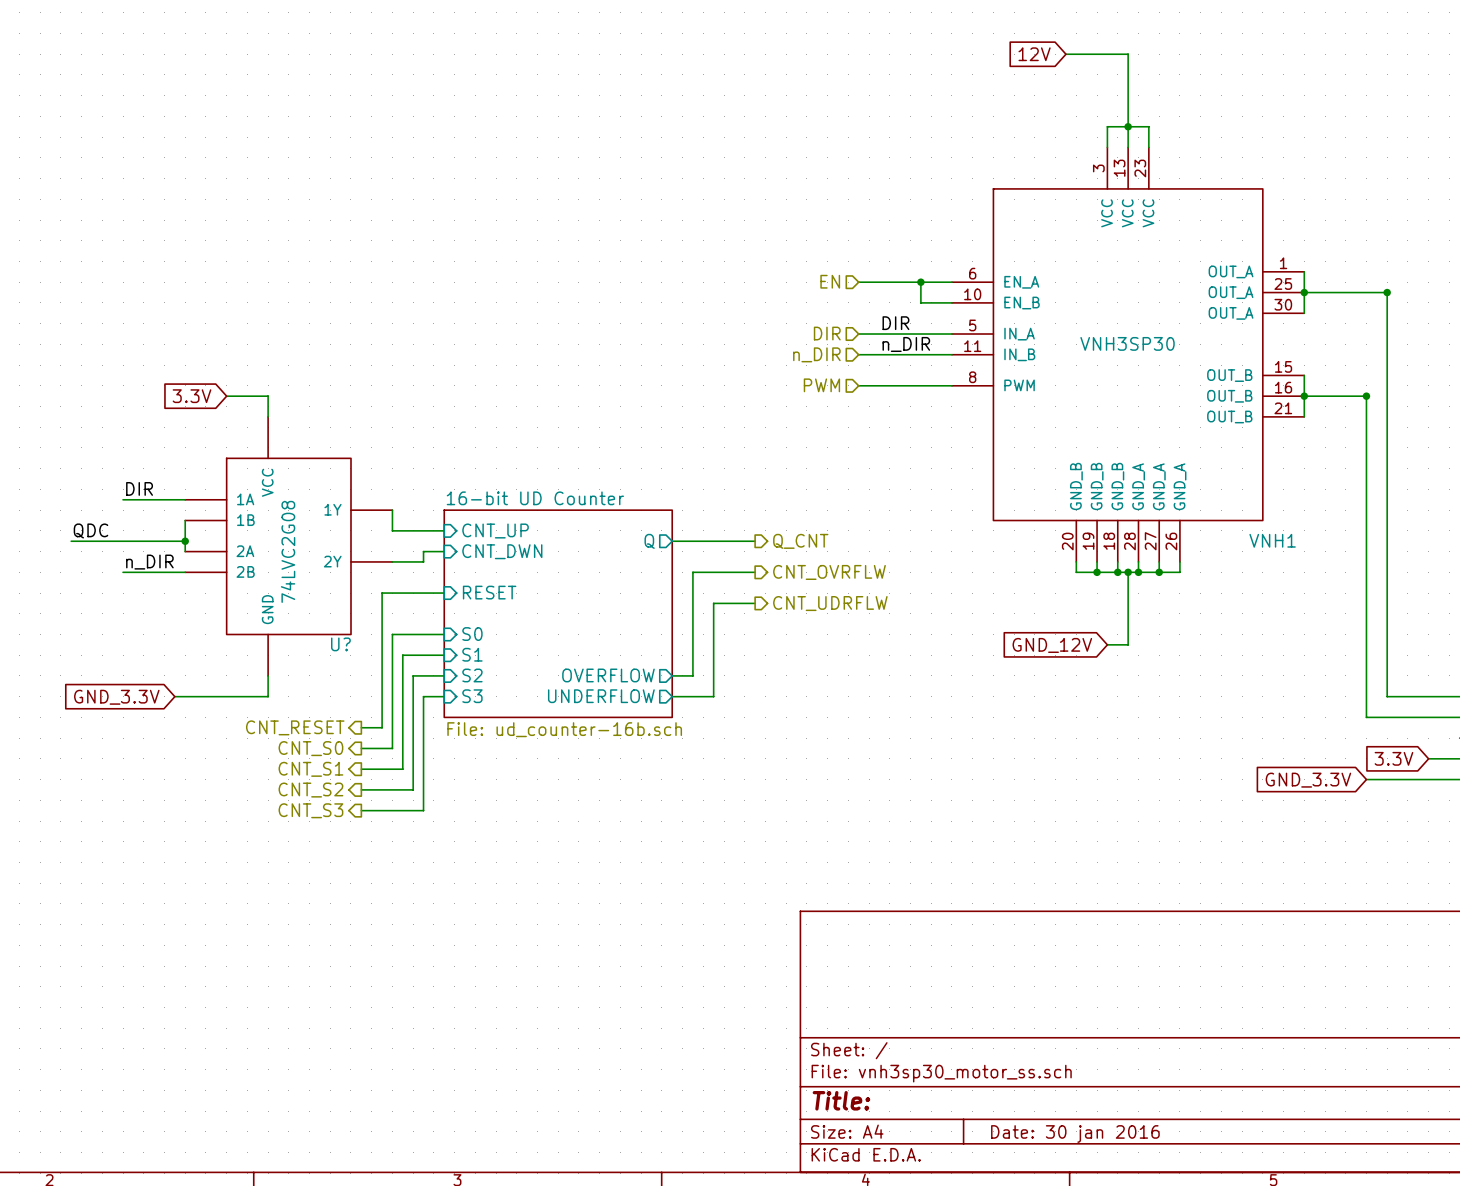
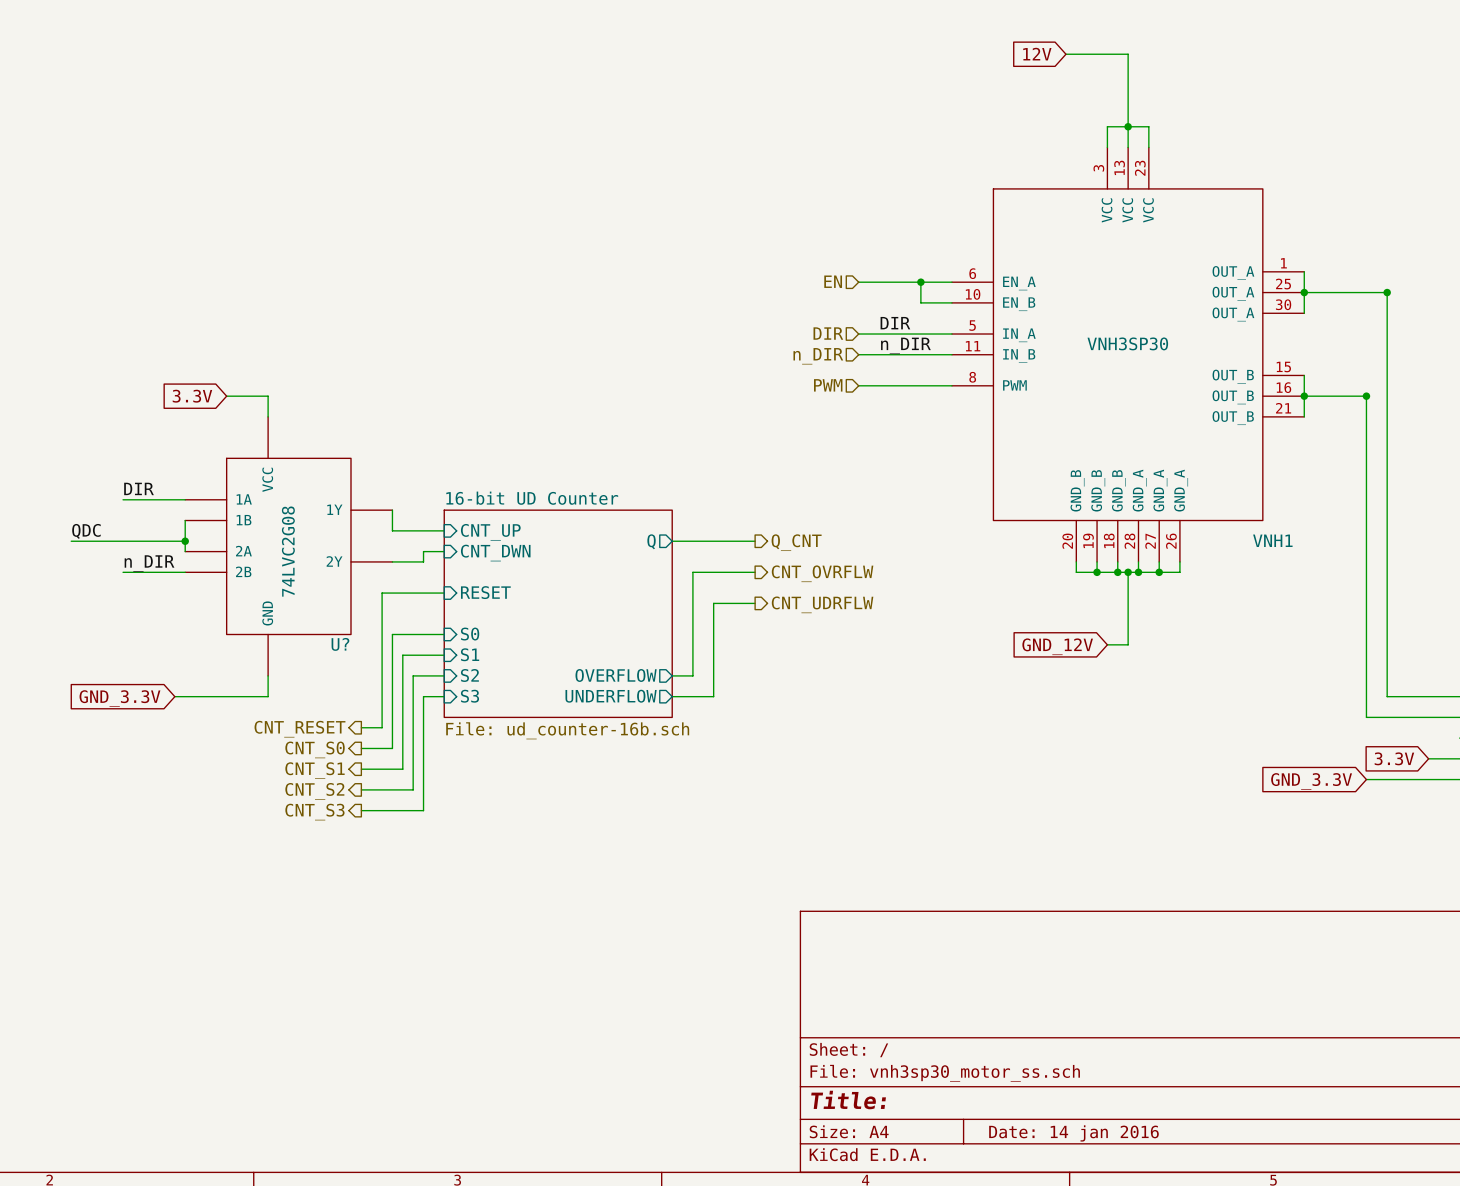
title block: Date: 30 jan 2016 (1075, 1133) -> Date: 14 jan 2016 (1073, 1133)

